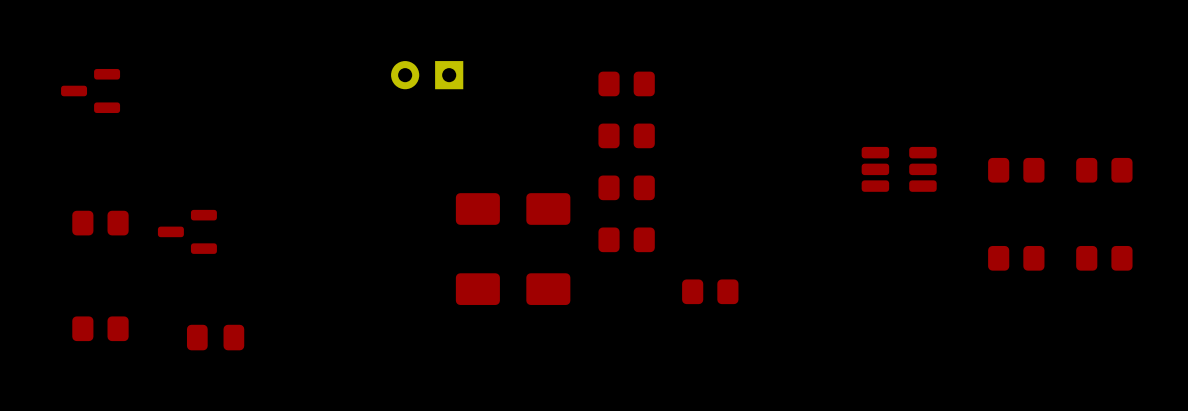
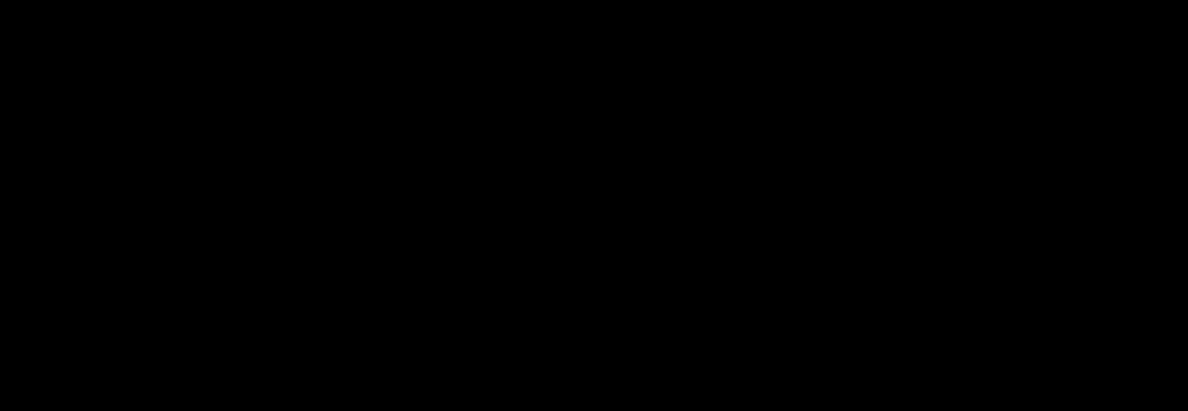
part: (427, 75) -> none
part: (626, 83) -> none
part: (90, 90) -> none
part: (626, 135) -> none
part: (899, 169) -> none
part: (1016, 170) -> none
part: (1104, 170) -> none
part: (626, 187) -> none
part: (513, 208) -> none
part: (100, 223) -> none
part: (187, 231) -> none
part: (626, 239) -> none
part: (1016, 258) -> none
part: (1104, 258) -> none
part: (513, 289) -> none
part: (710, 291) -> none
part: (100, 328) -> none
part: (215, 337) -> none

